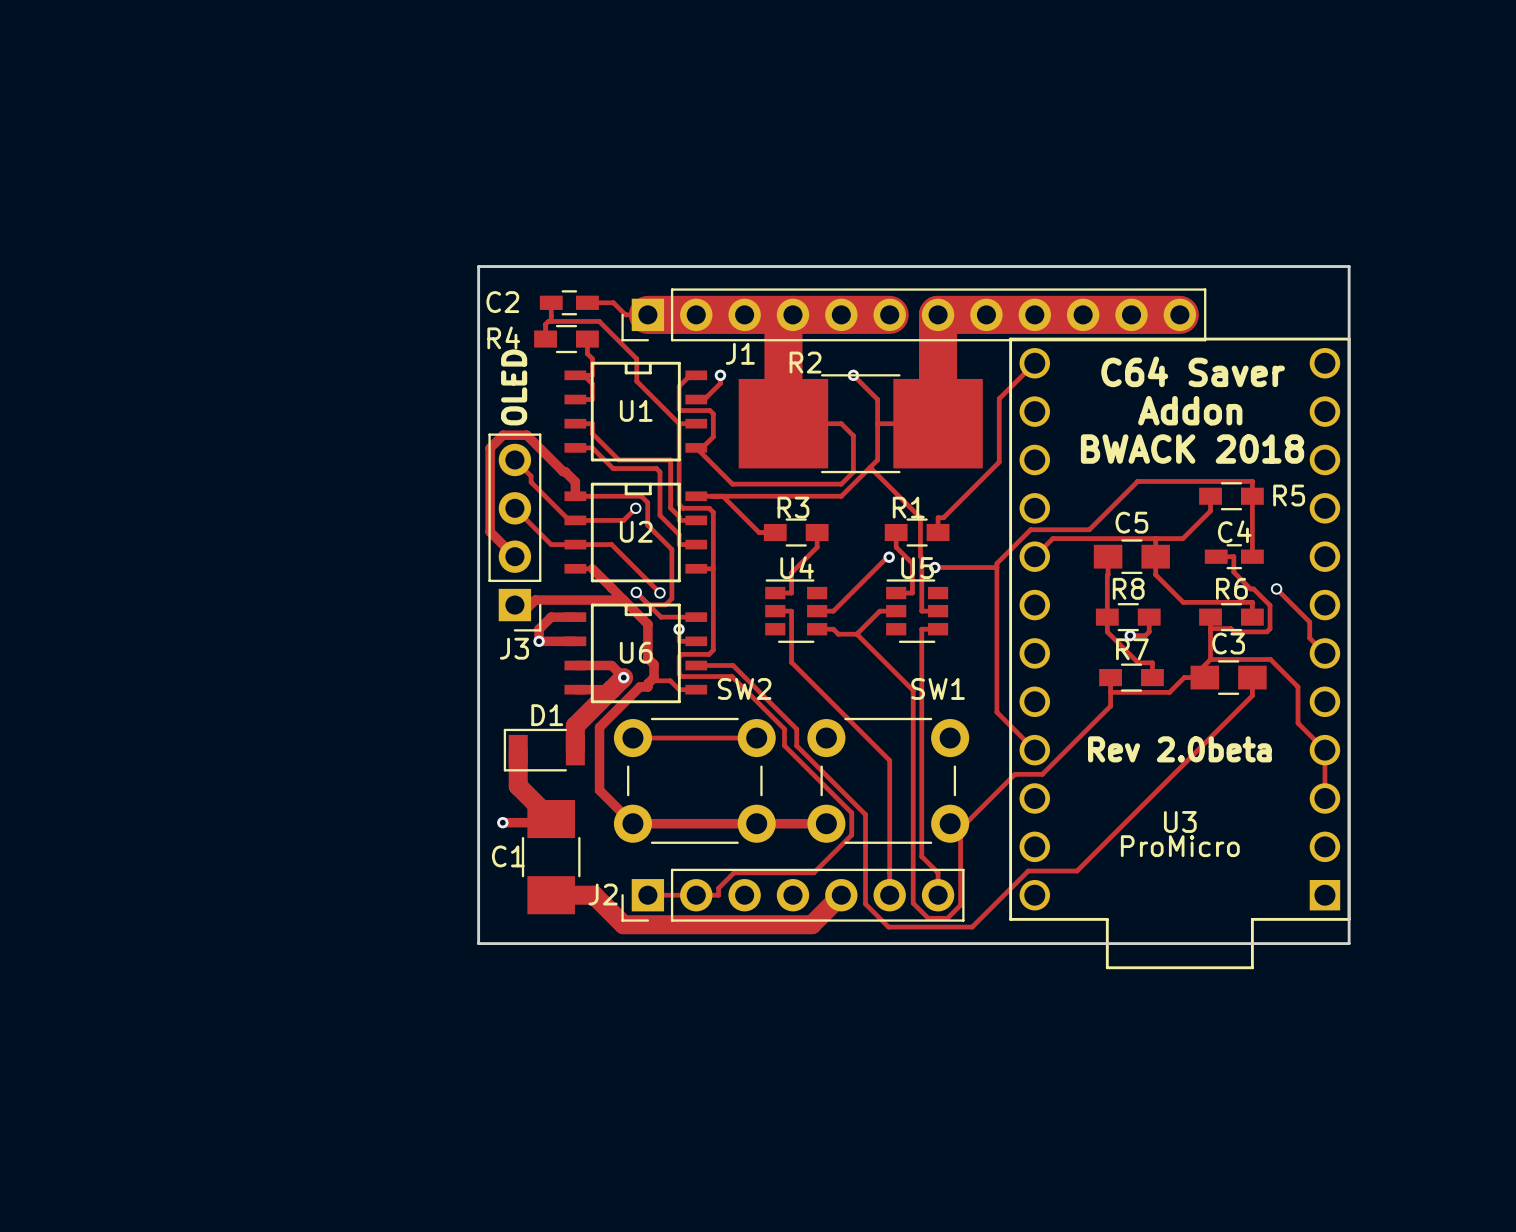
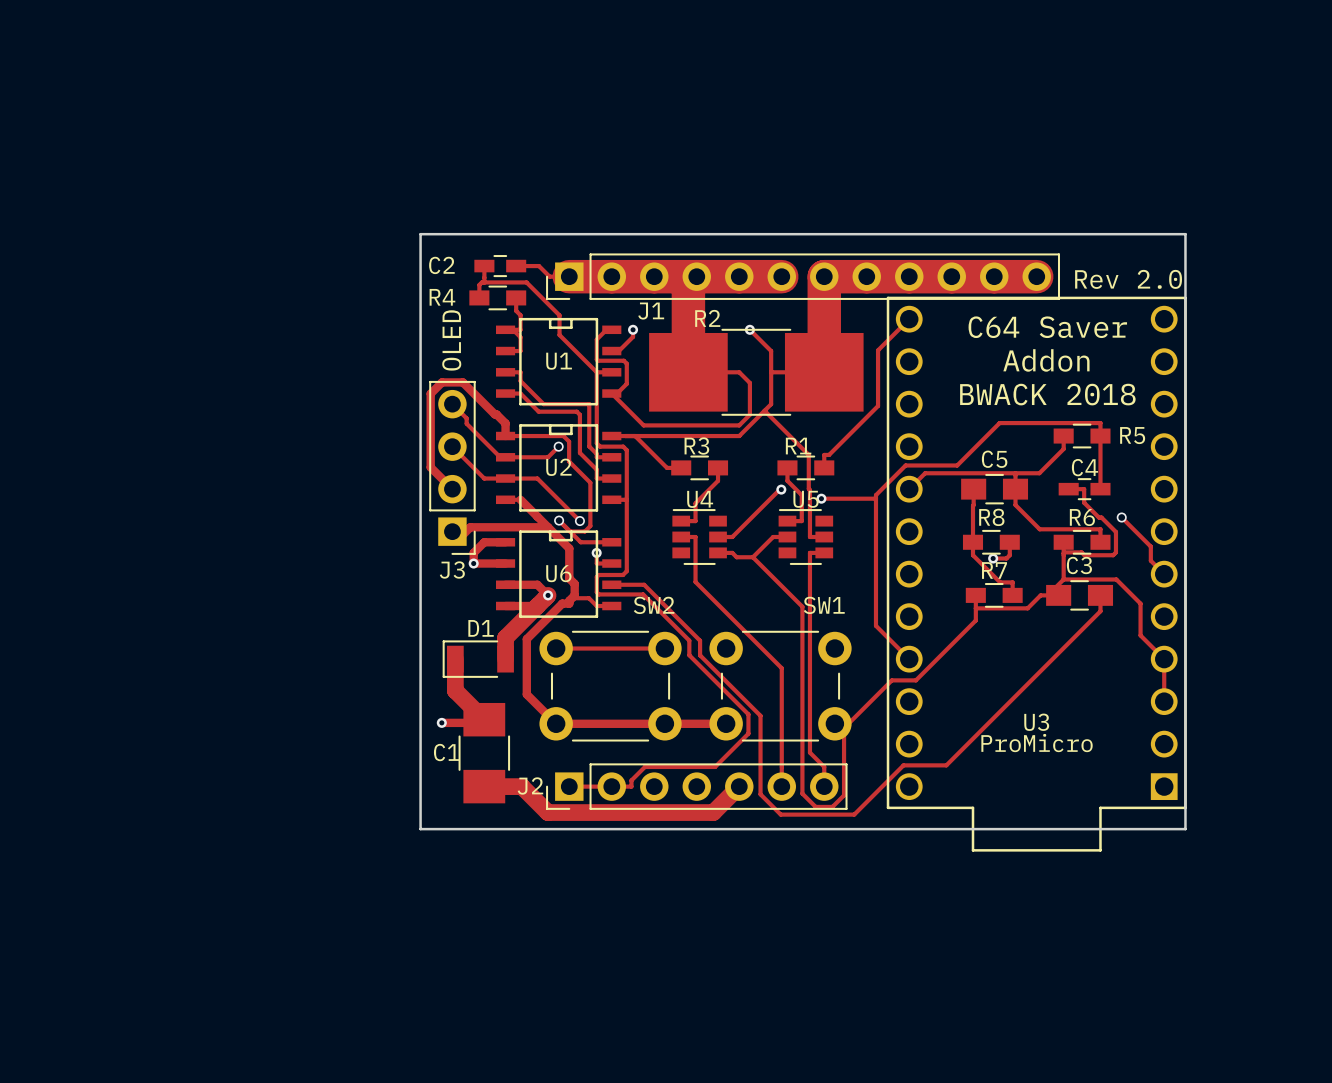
text: none -> Rev 2.0 (1128, 279)
text: Rev 2.0beta (1179, 749) -> none

